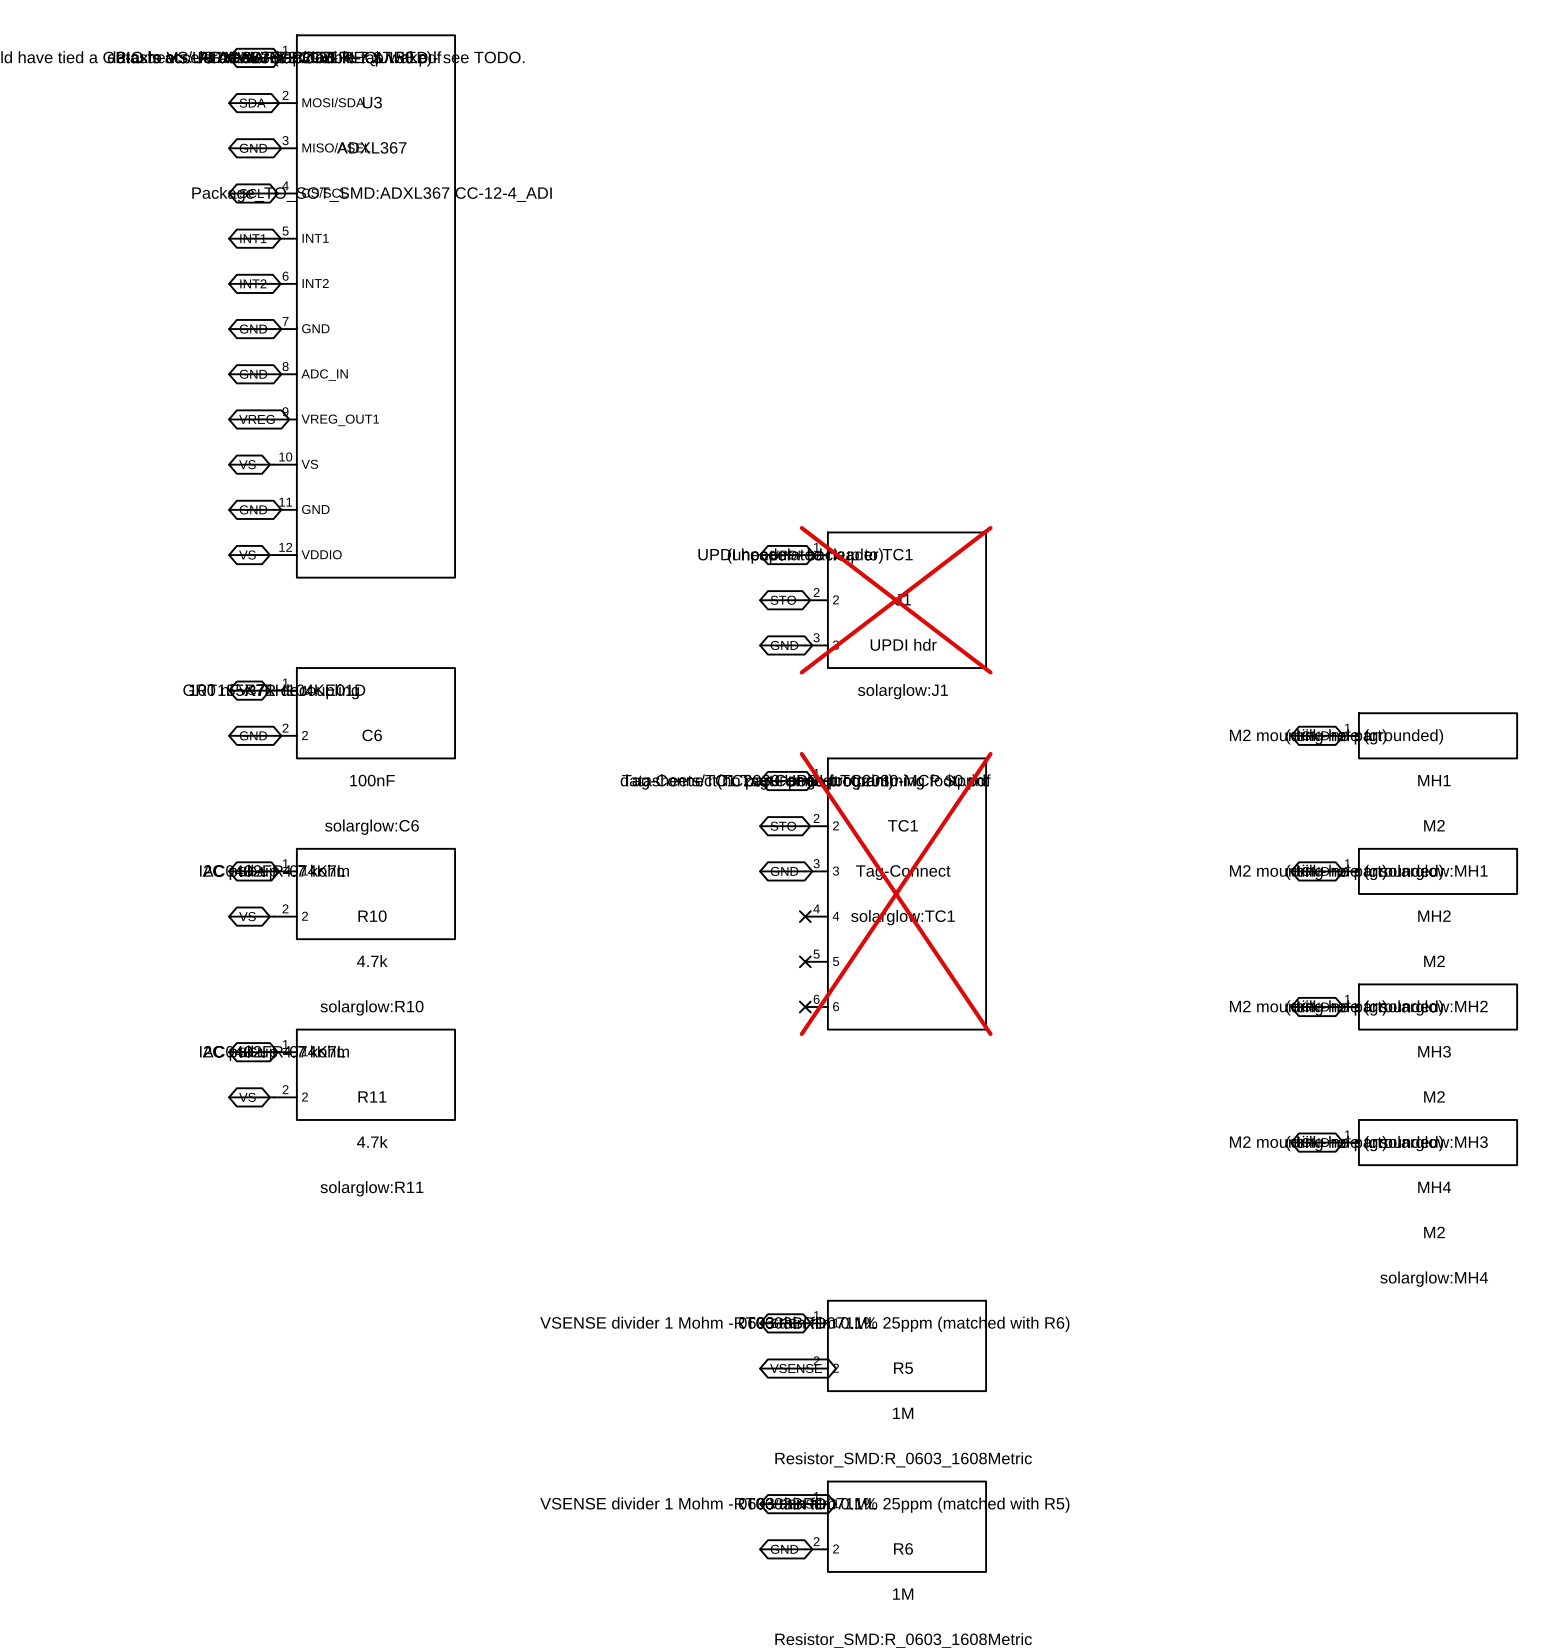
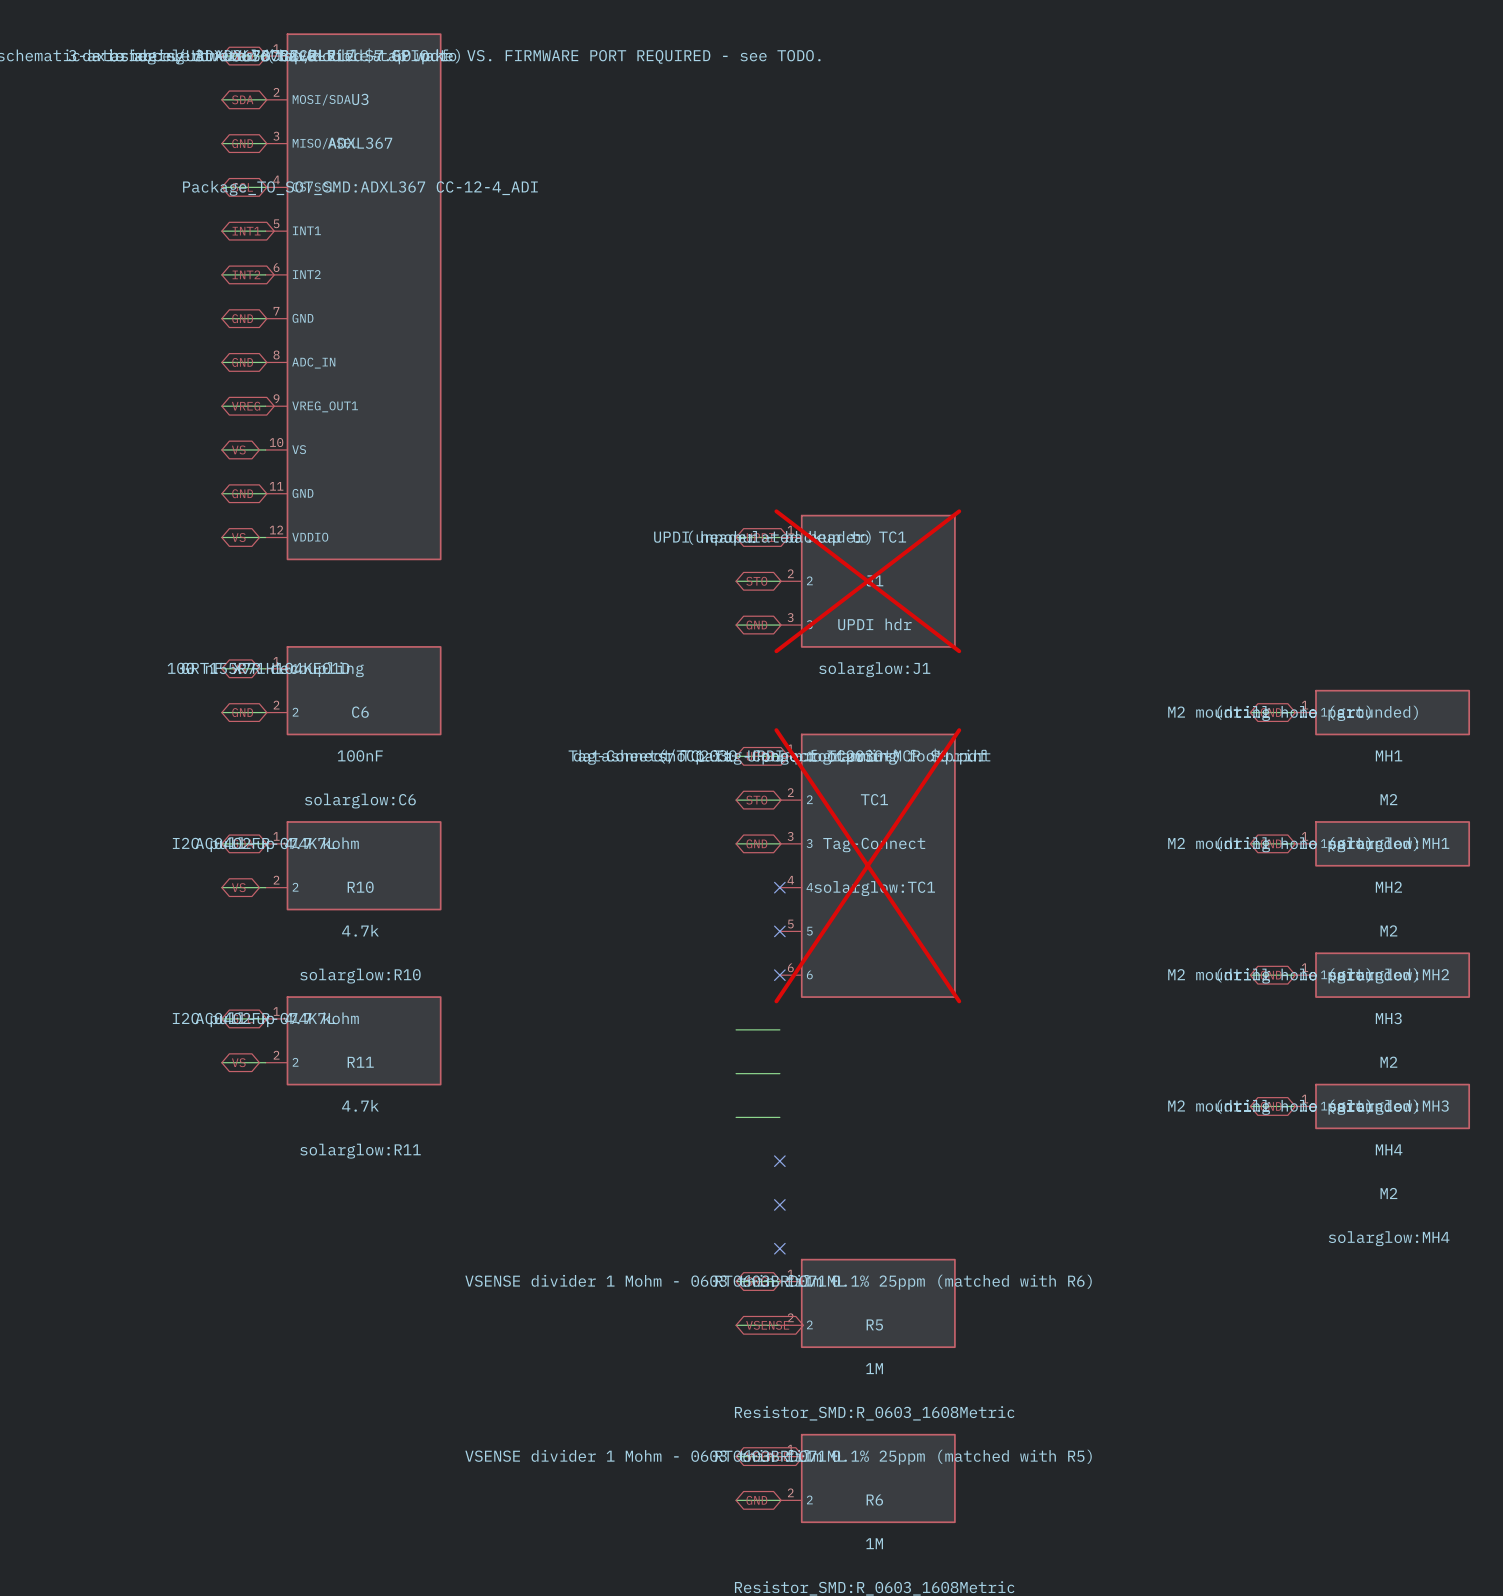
wire: none -> (736, 1029) (779, 1029)
wire: none -> (736, 1073) (779, 1073)
wire: none -> (736, 1117) (779, 1117)
no-connect mark: none -> (779, 1161)
no-connect mark: none -> (779, 1204)
no-connect mark: none -> (779, 1248)

